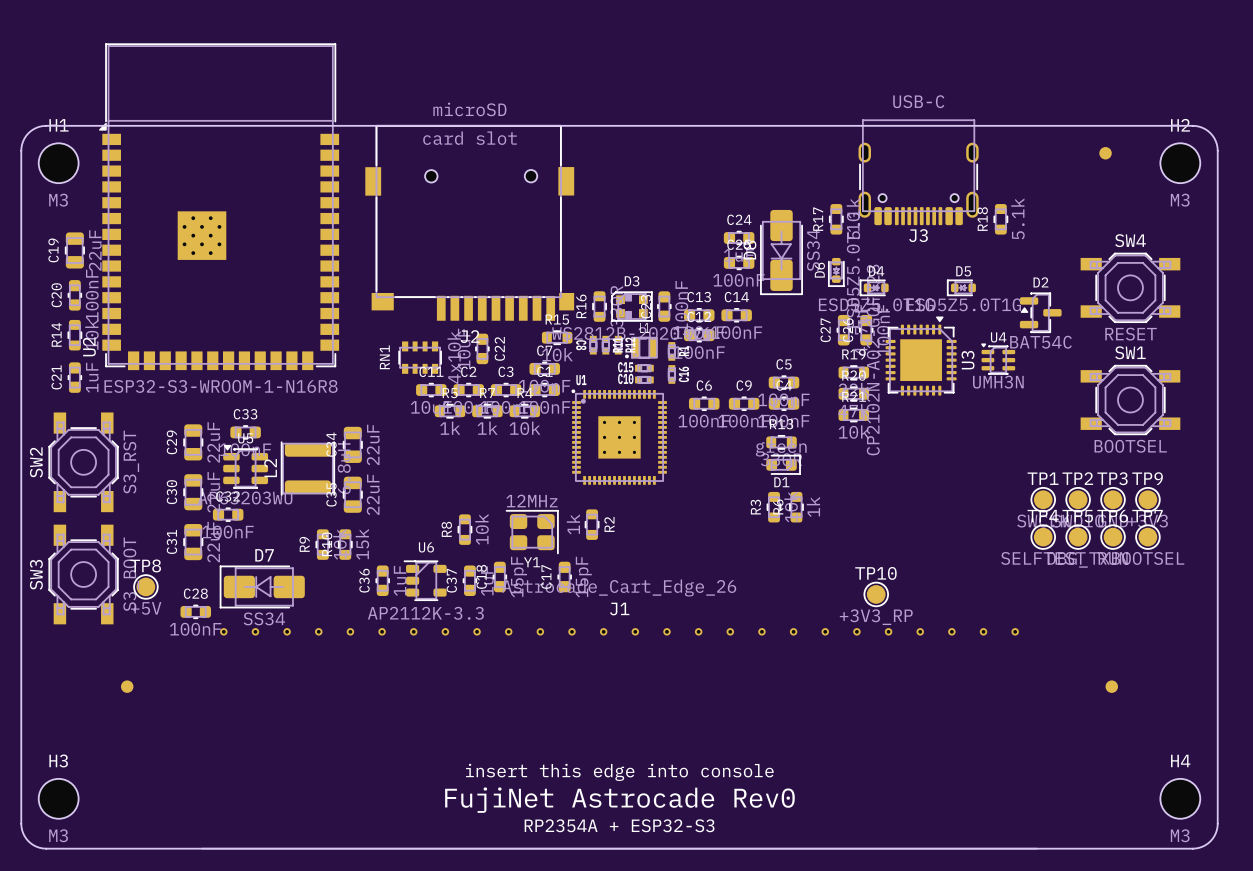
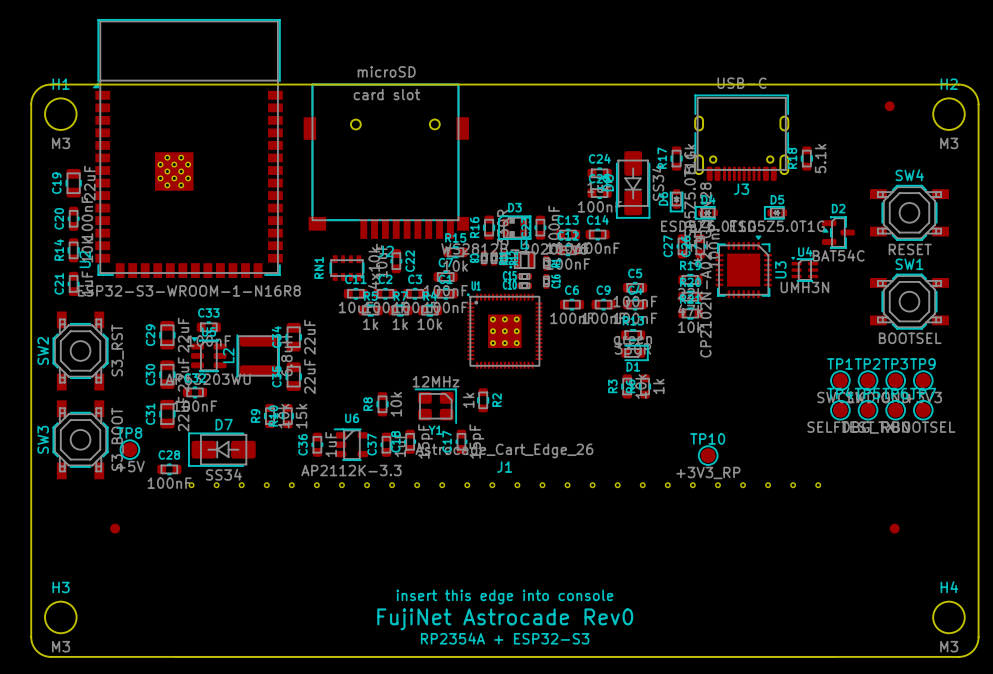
J3 footprint: [858, 119, 979, 226] -> [694, 94, 790, 181]

